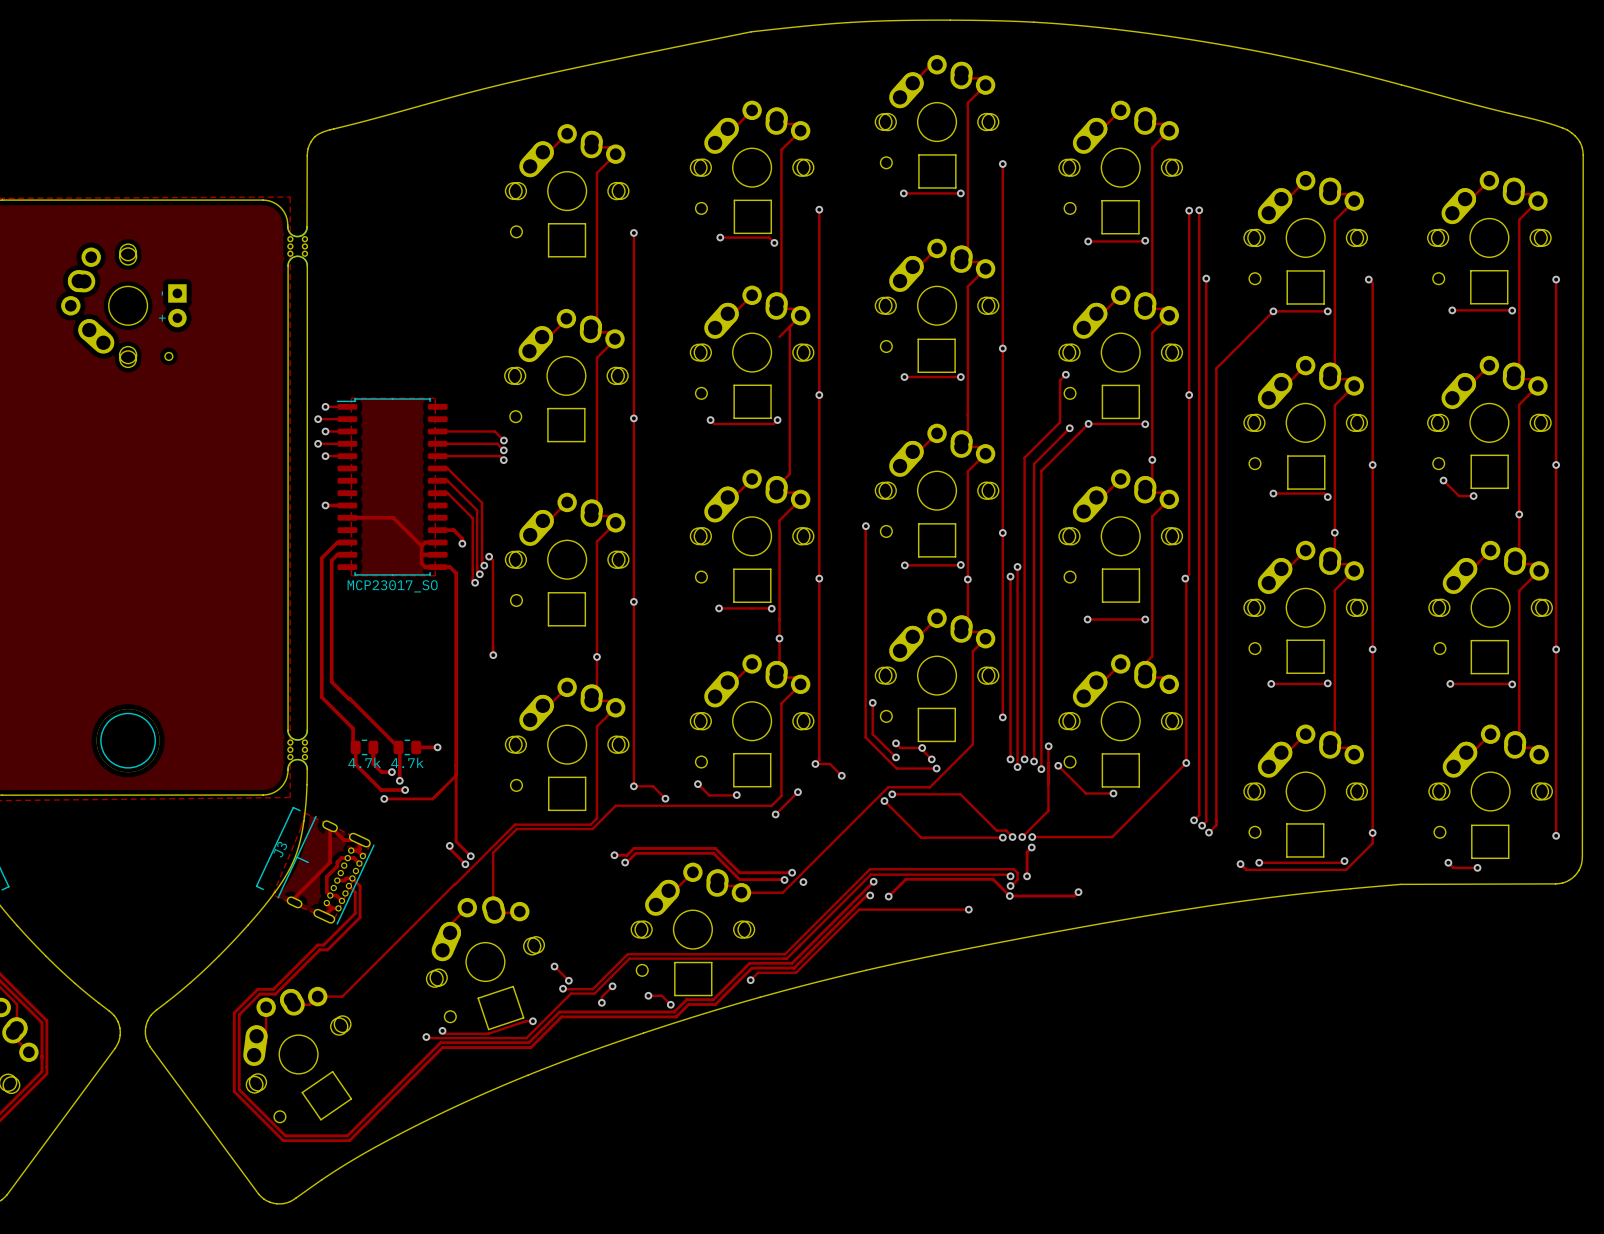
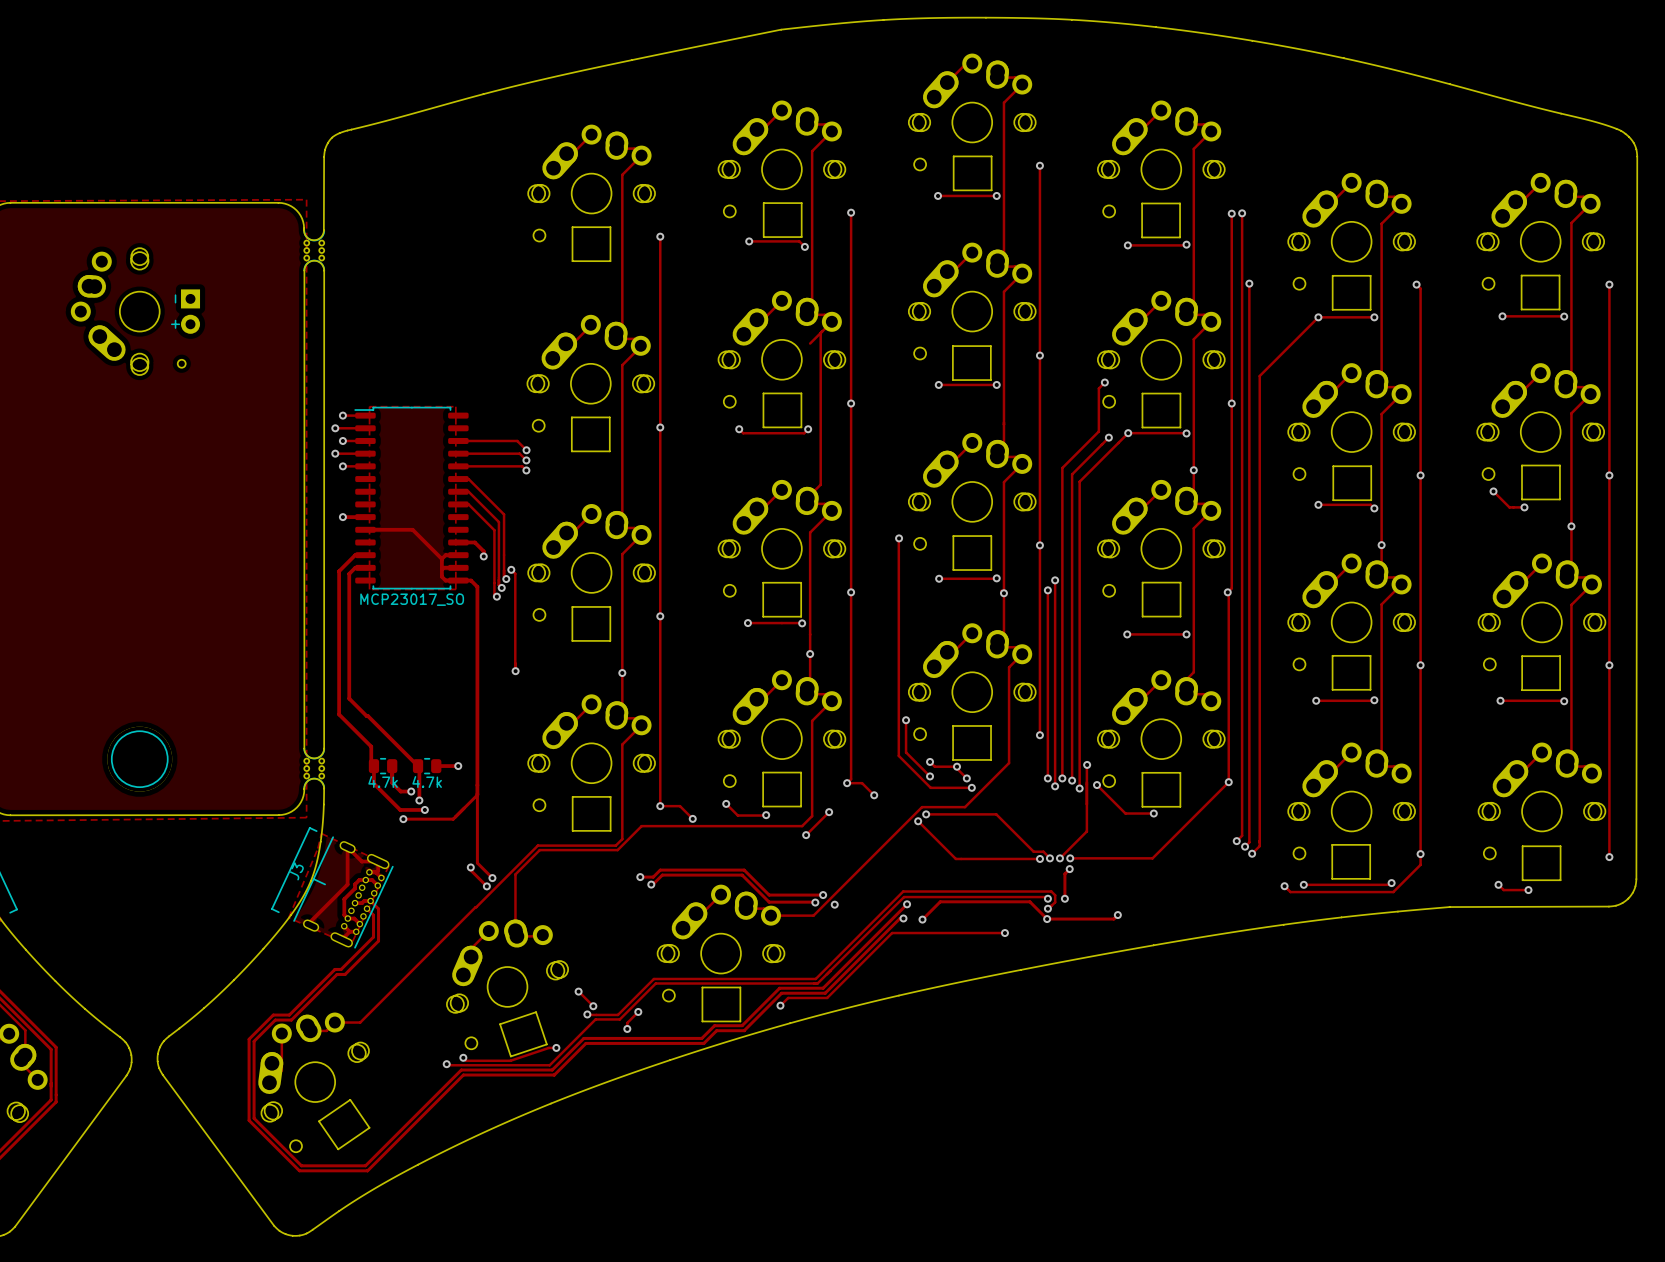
track: (648, 995) (661, 995) (670, 1004) -> none
via: (648, 995) -> none
via: (670, 1004) -> none

